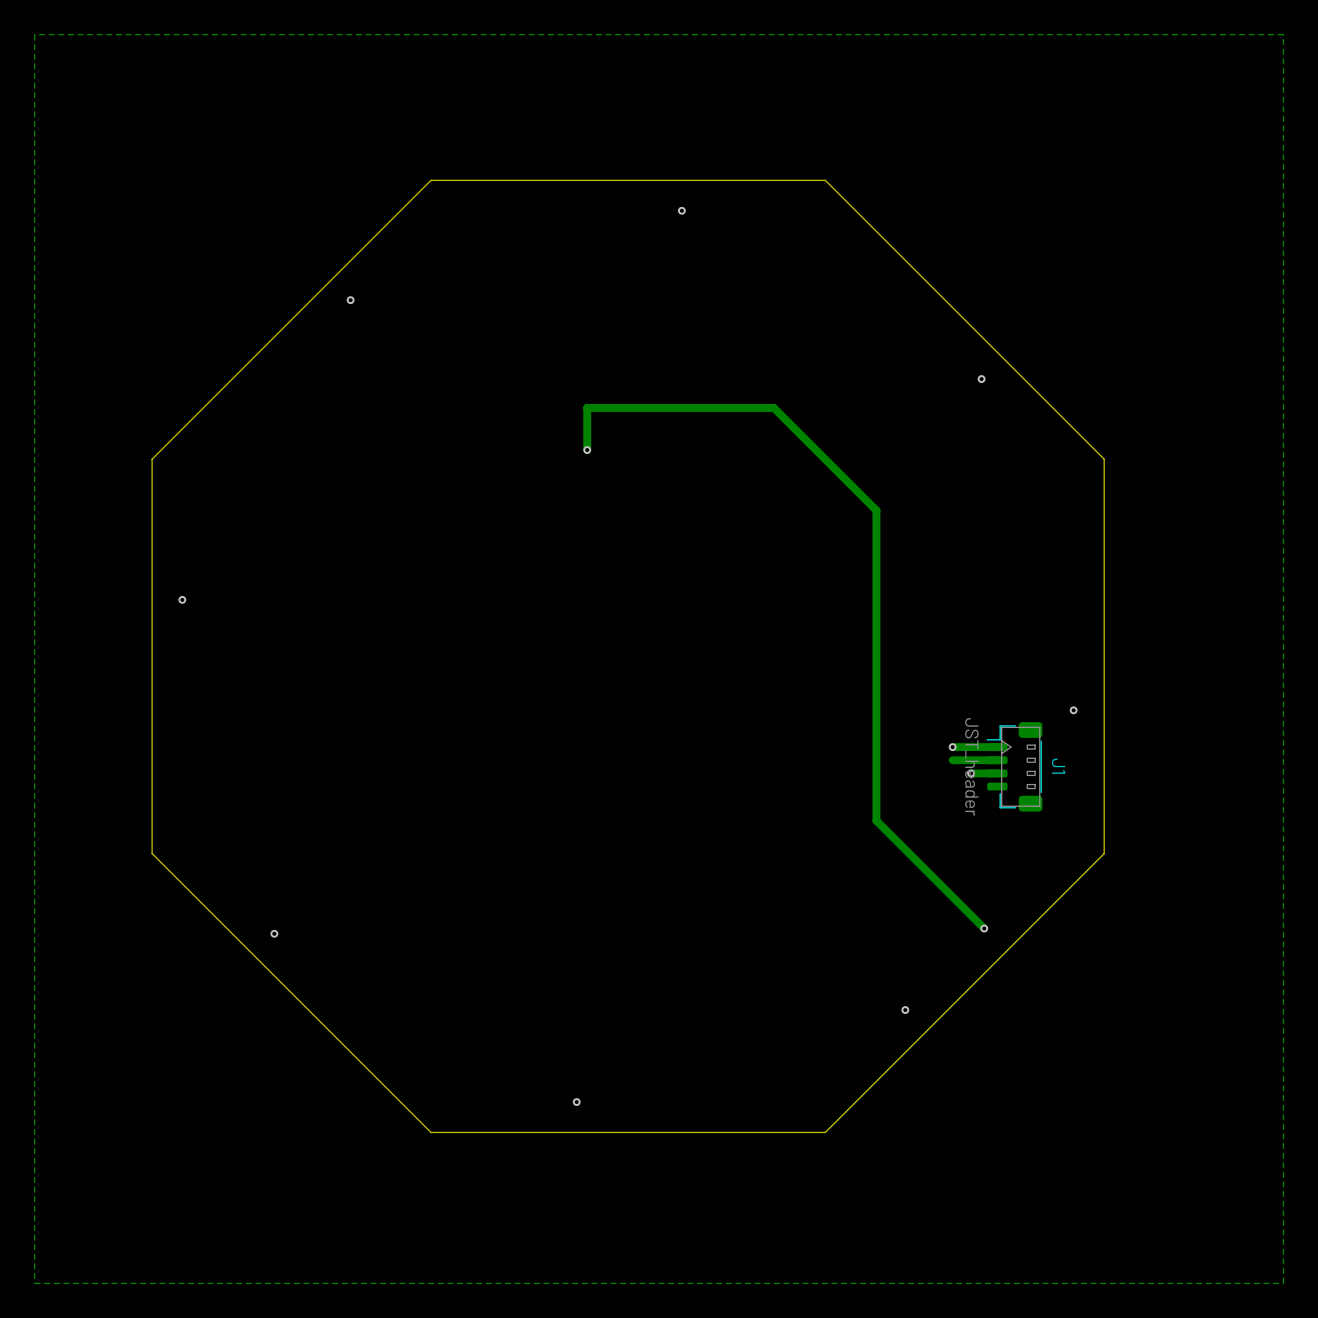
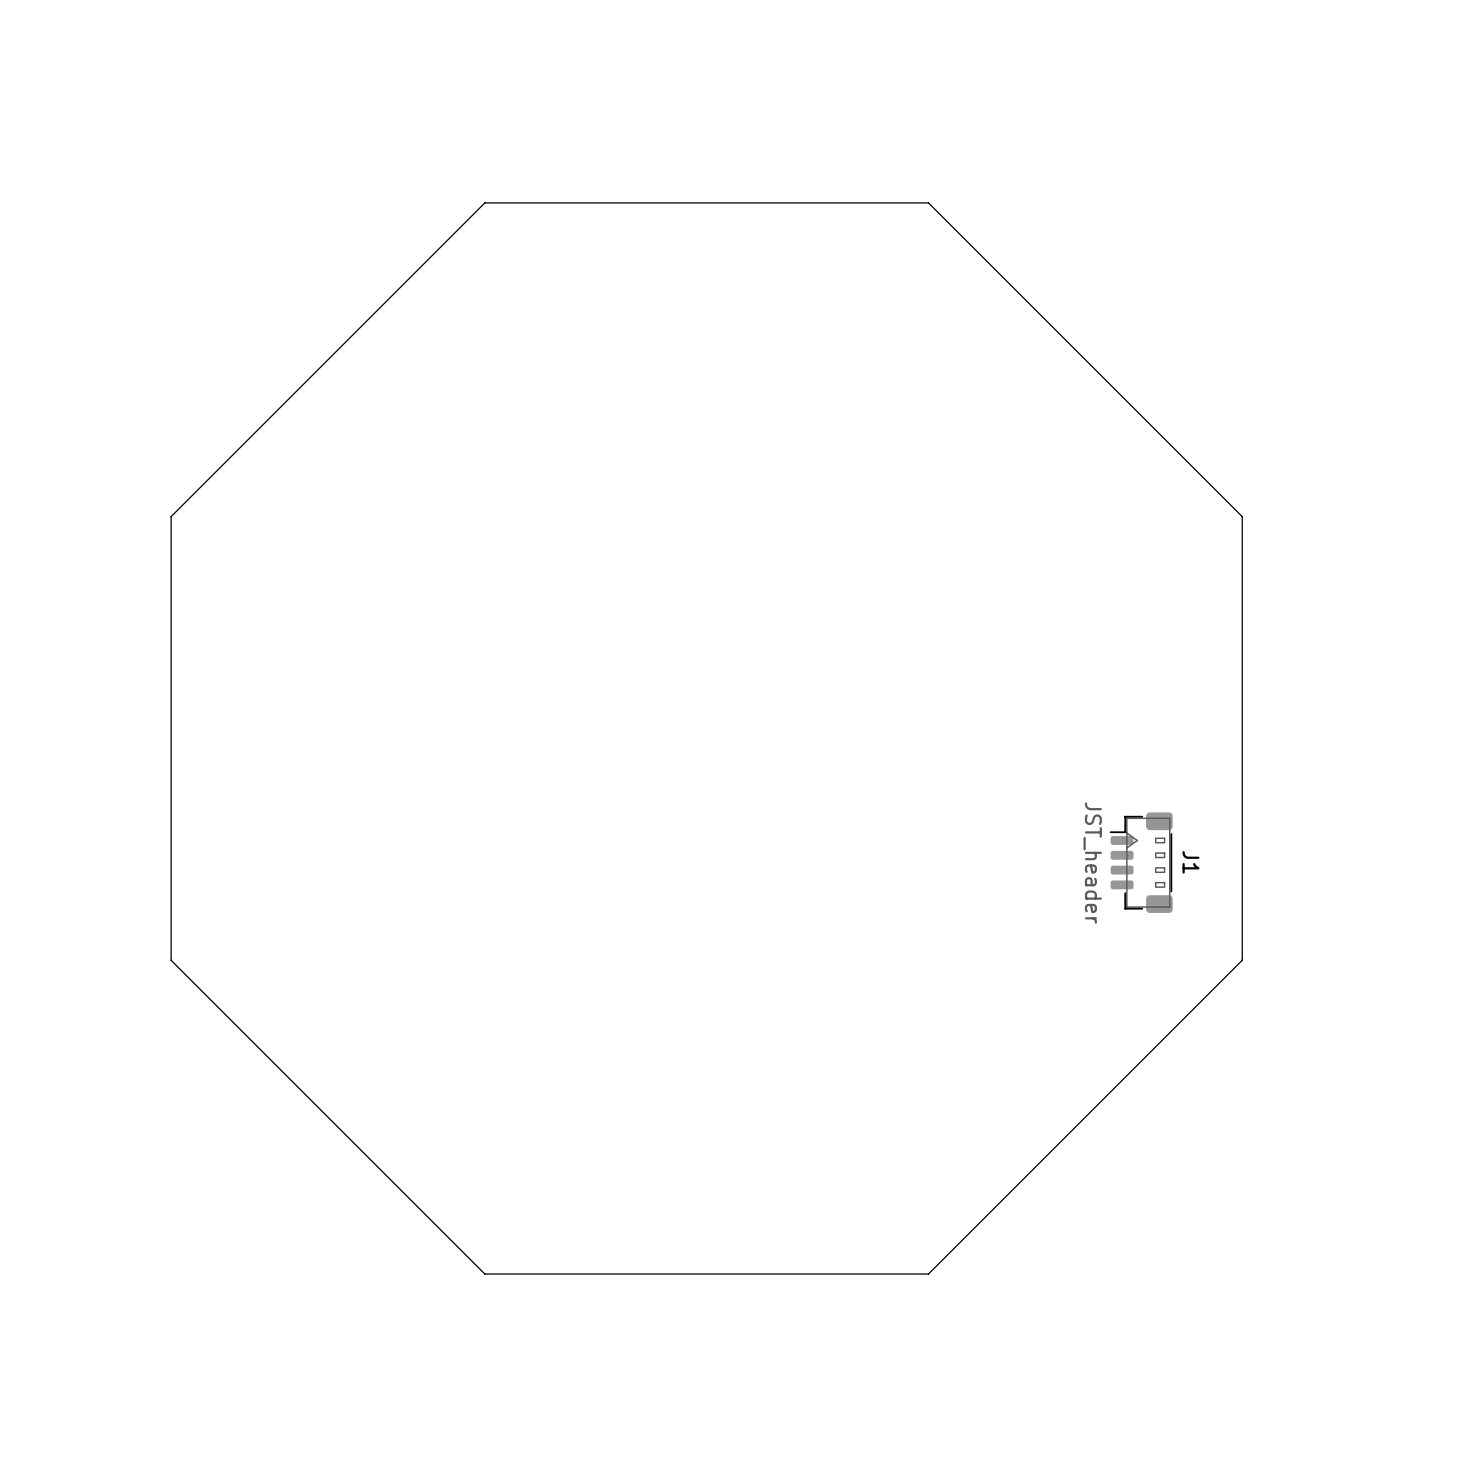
zone outline: (1283, 34) (1283, 1283) (34, 1283) (34, 34) (1283, 34) -> none
via: (681, 210) -> none
via: (350, 300) -> none
via: (981, 379) -> none
track: (587, 450) (587, 407) (773, 407) (876, 510) (876, 820) (984, 928) -> none
via: (587, 450) -> none
via: (182, 599) -> none
via: (1073, 710) -> none
via: (952, 747) -> none
track: (997, 747) (952, 747) -> none
track: (997, 760) (952, 760) -> none
via: (971, 773) -> none
track: (997, 773) (971, 773) -> none
via: (984, 928) -> none
via: (274, 933) -> none
via: (905, 1010) -> none
via: (576, 1102) -> none

